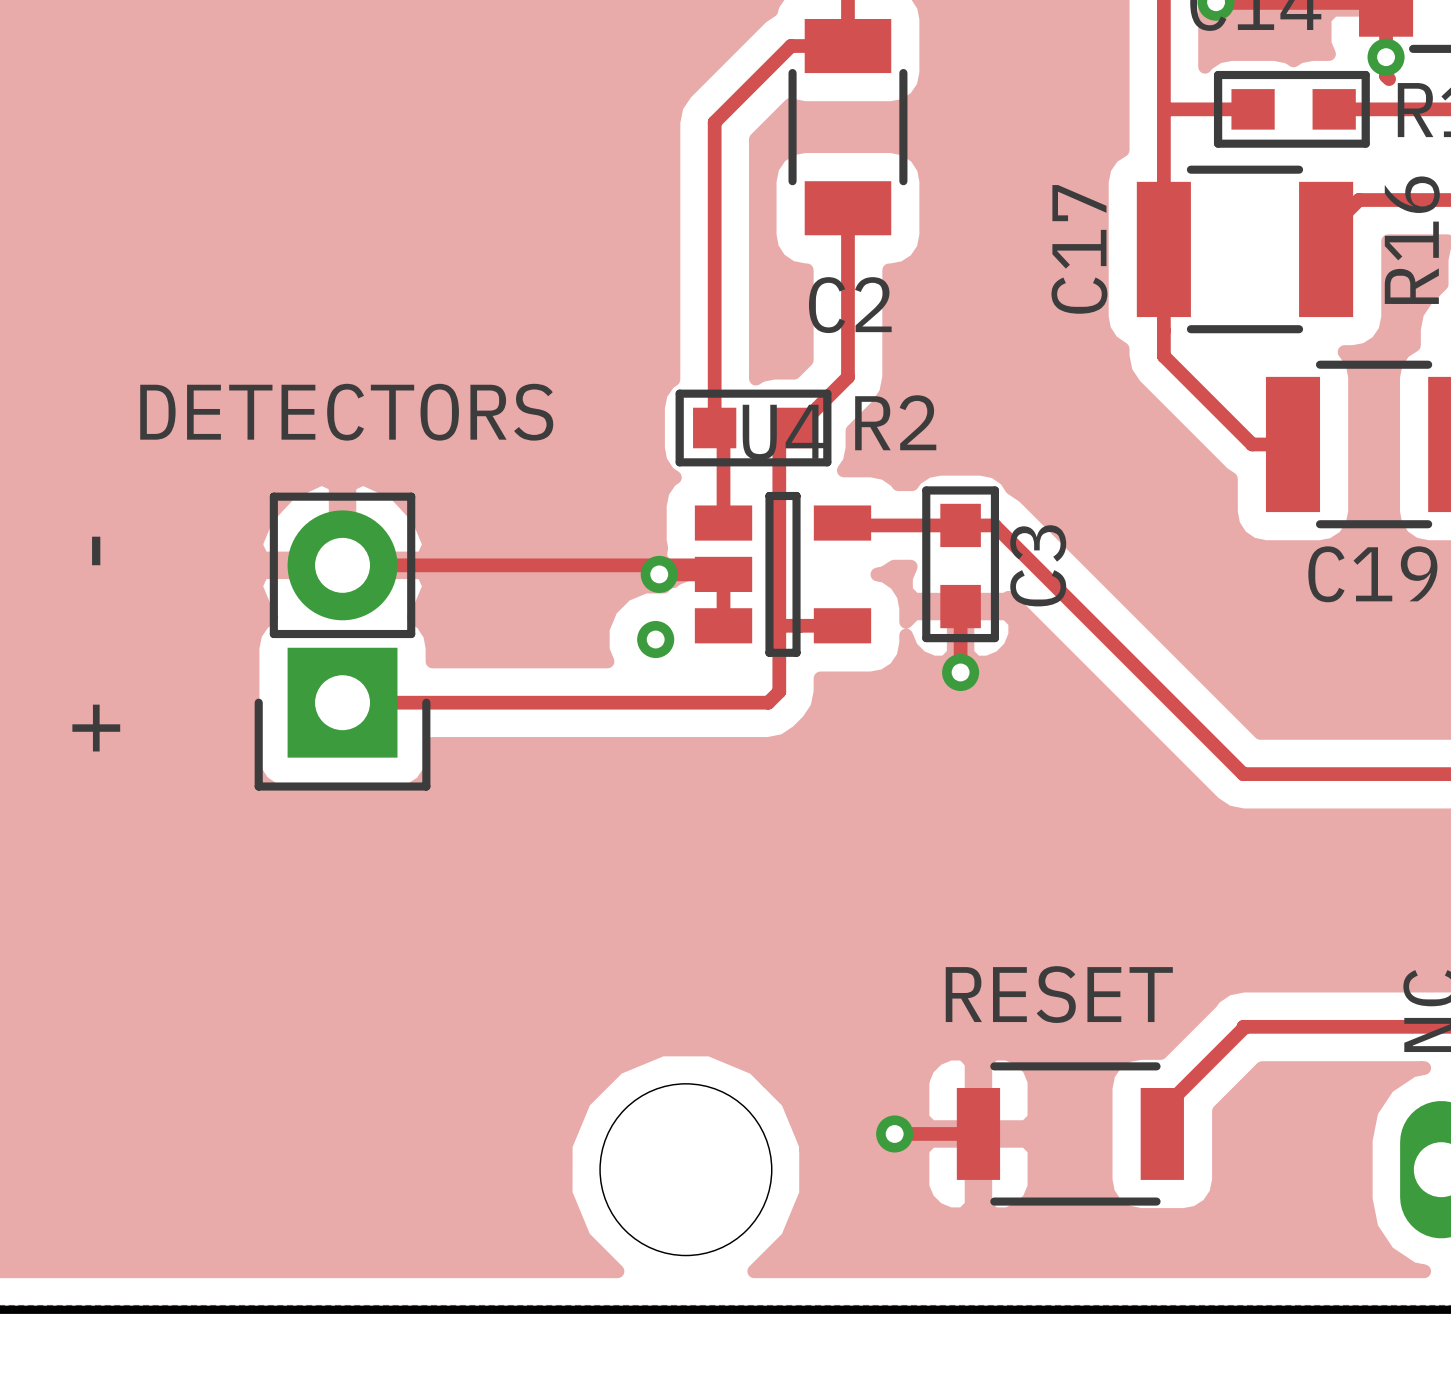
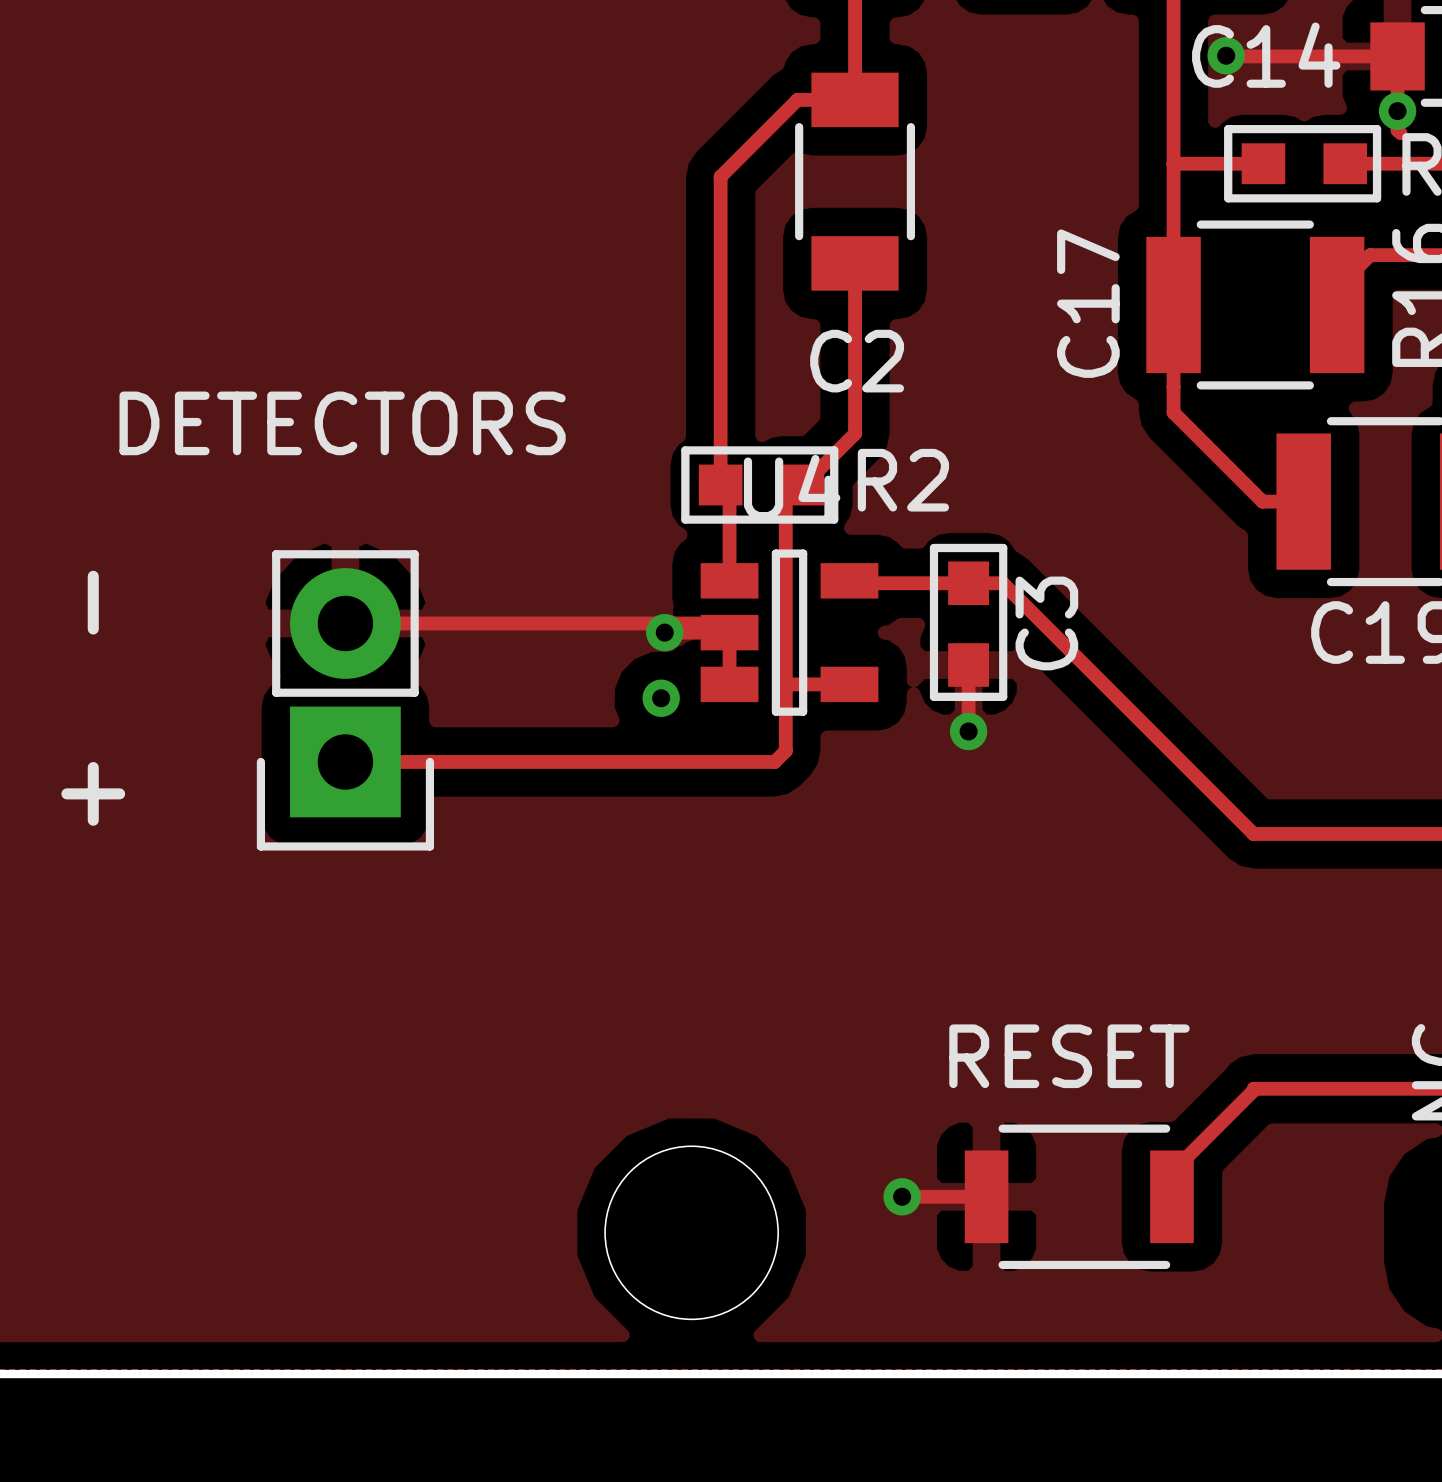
text position: DETECTORS (346, 412) -> DETECTORS (342, 423)

